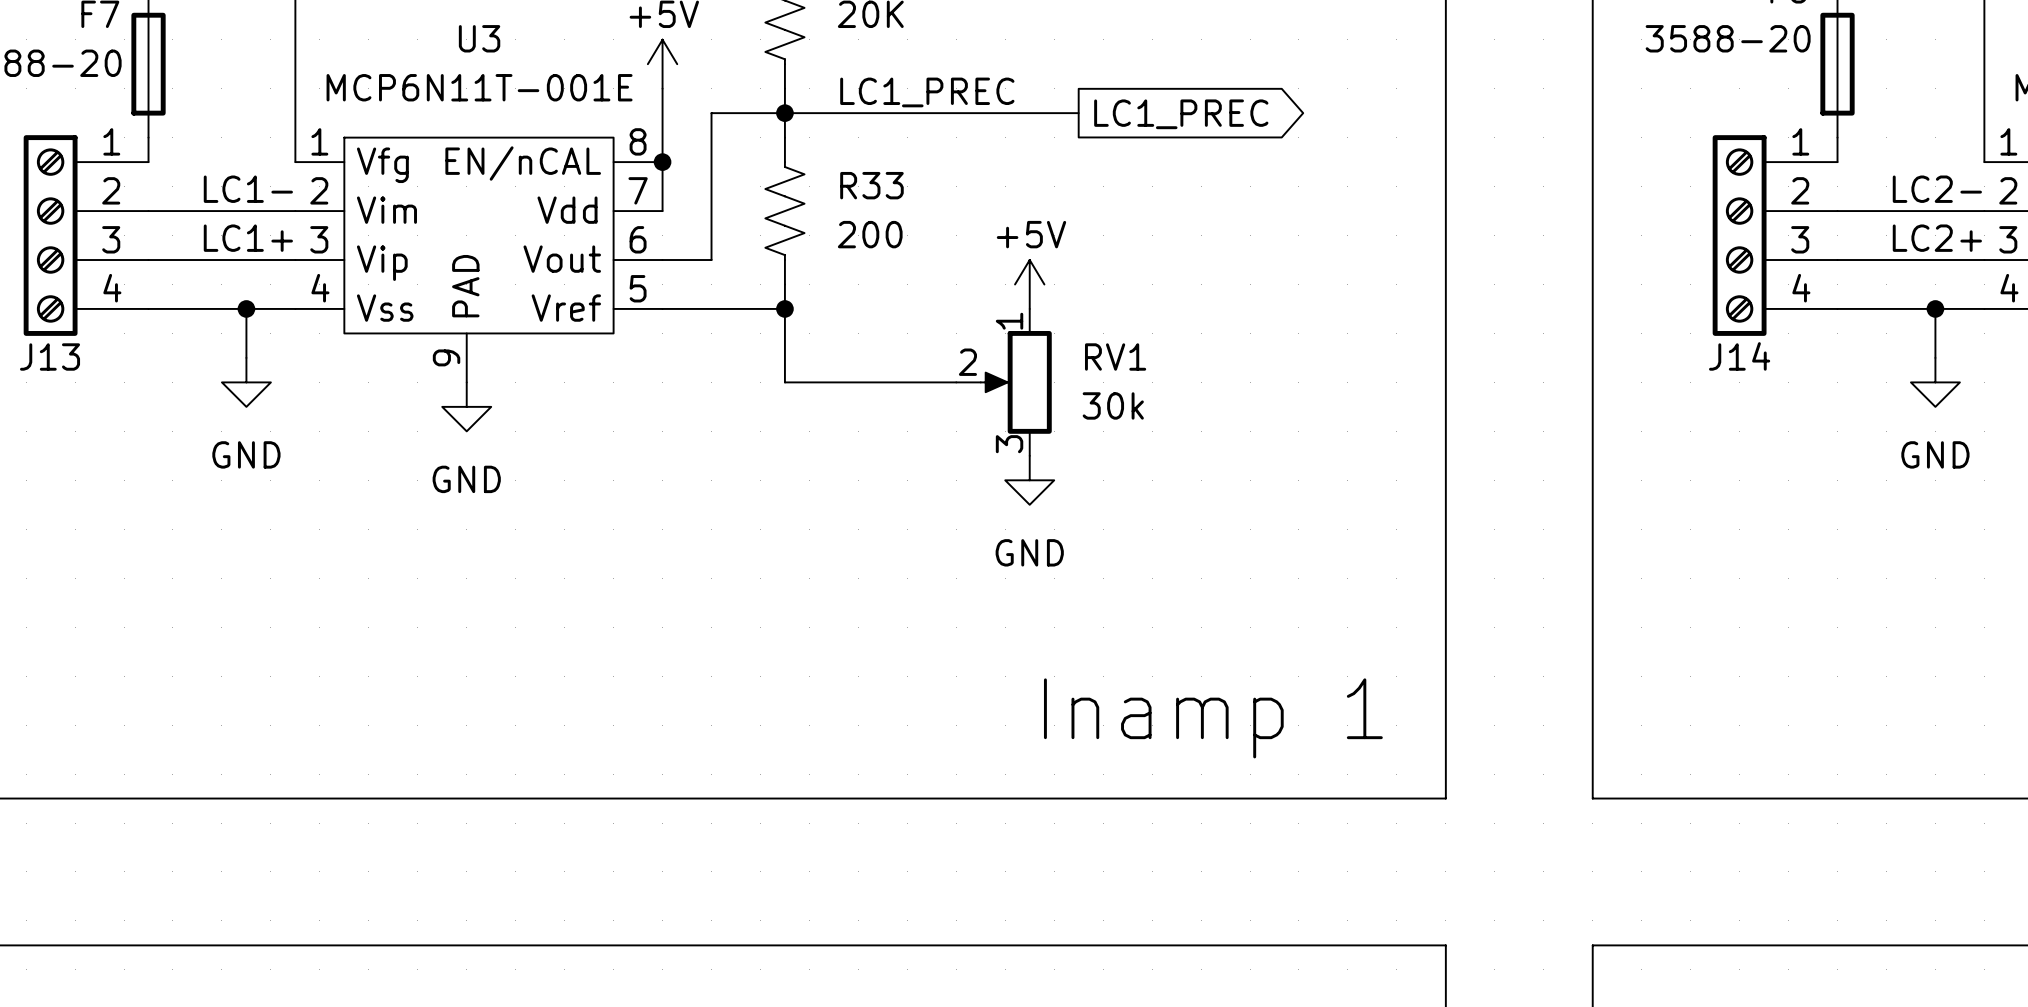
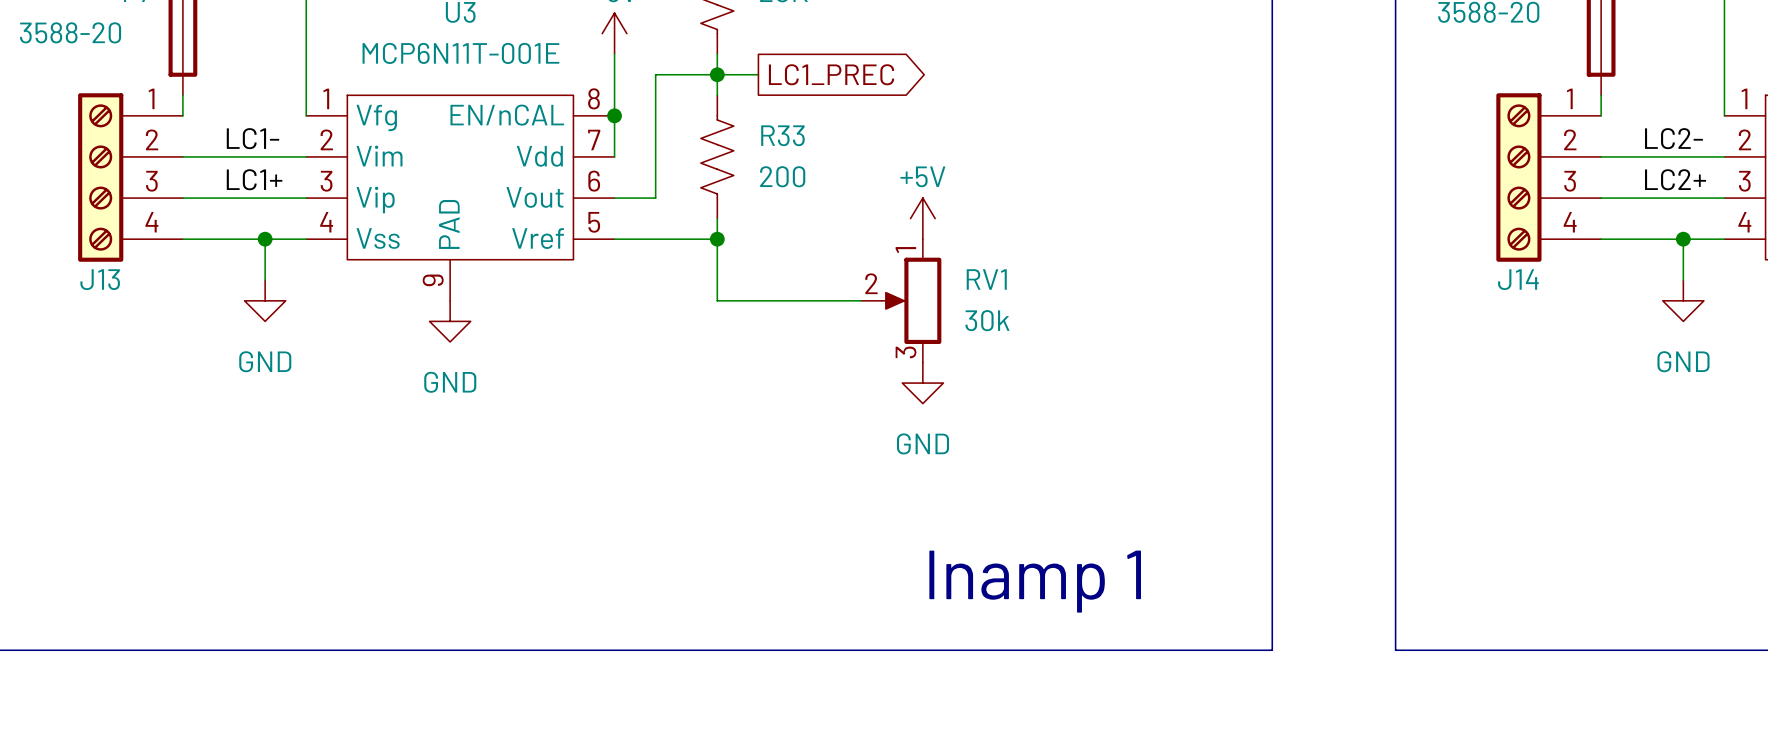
label: LC1_PREC (927, 92) -> none
wire: (833, 113) (1078, 113) -> none
global label position: LC1_PREC (1181, 114) -> LC1_PREC (831, 74)

